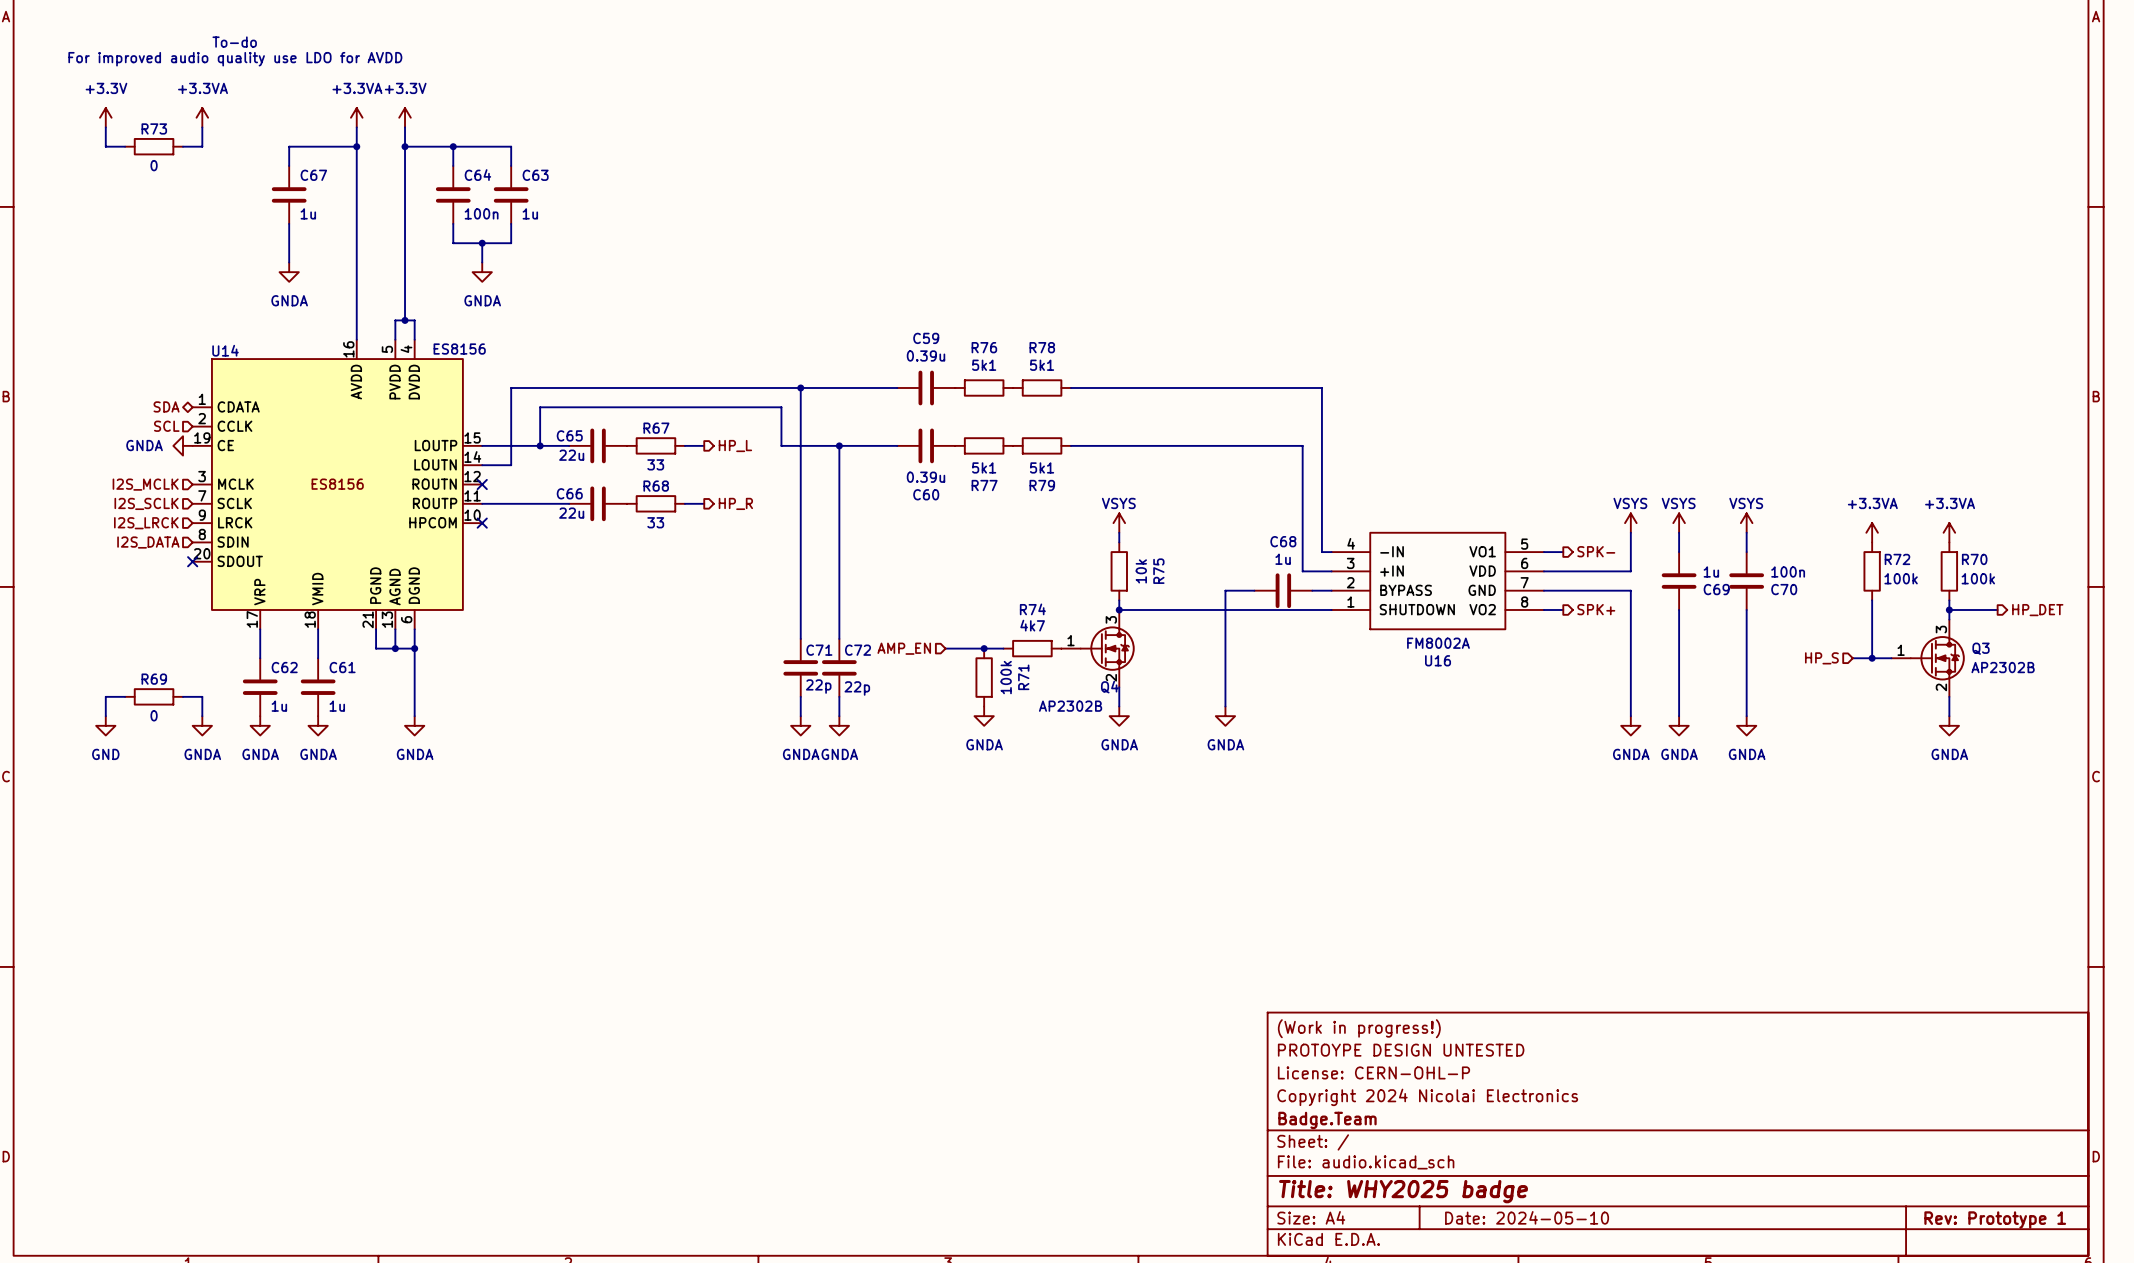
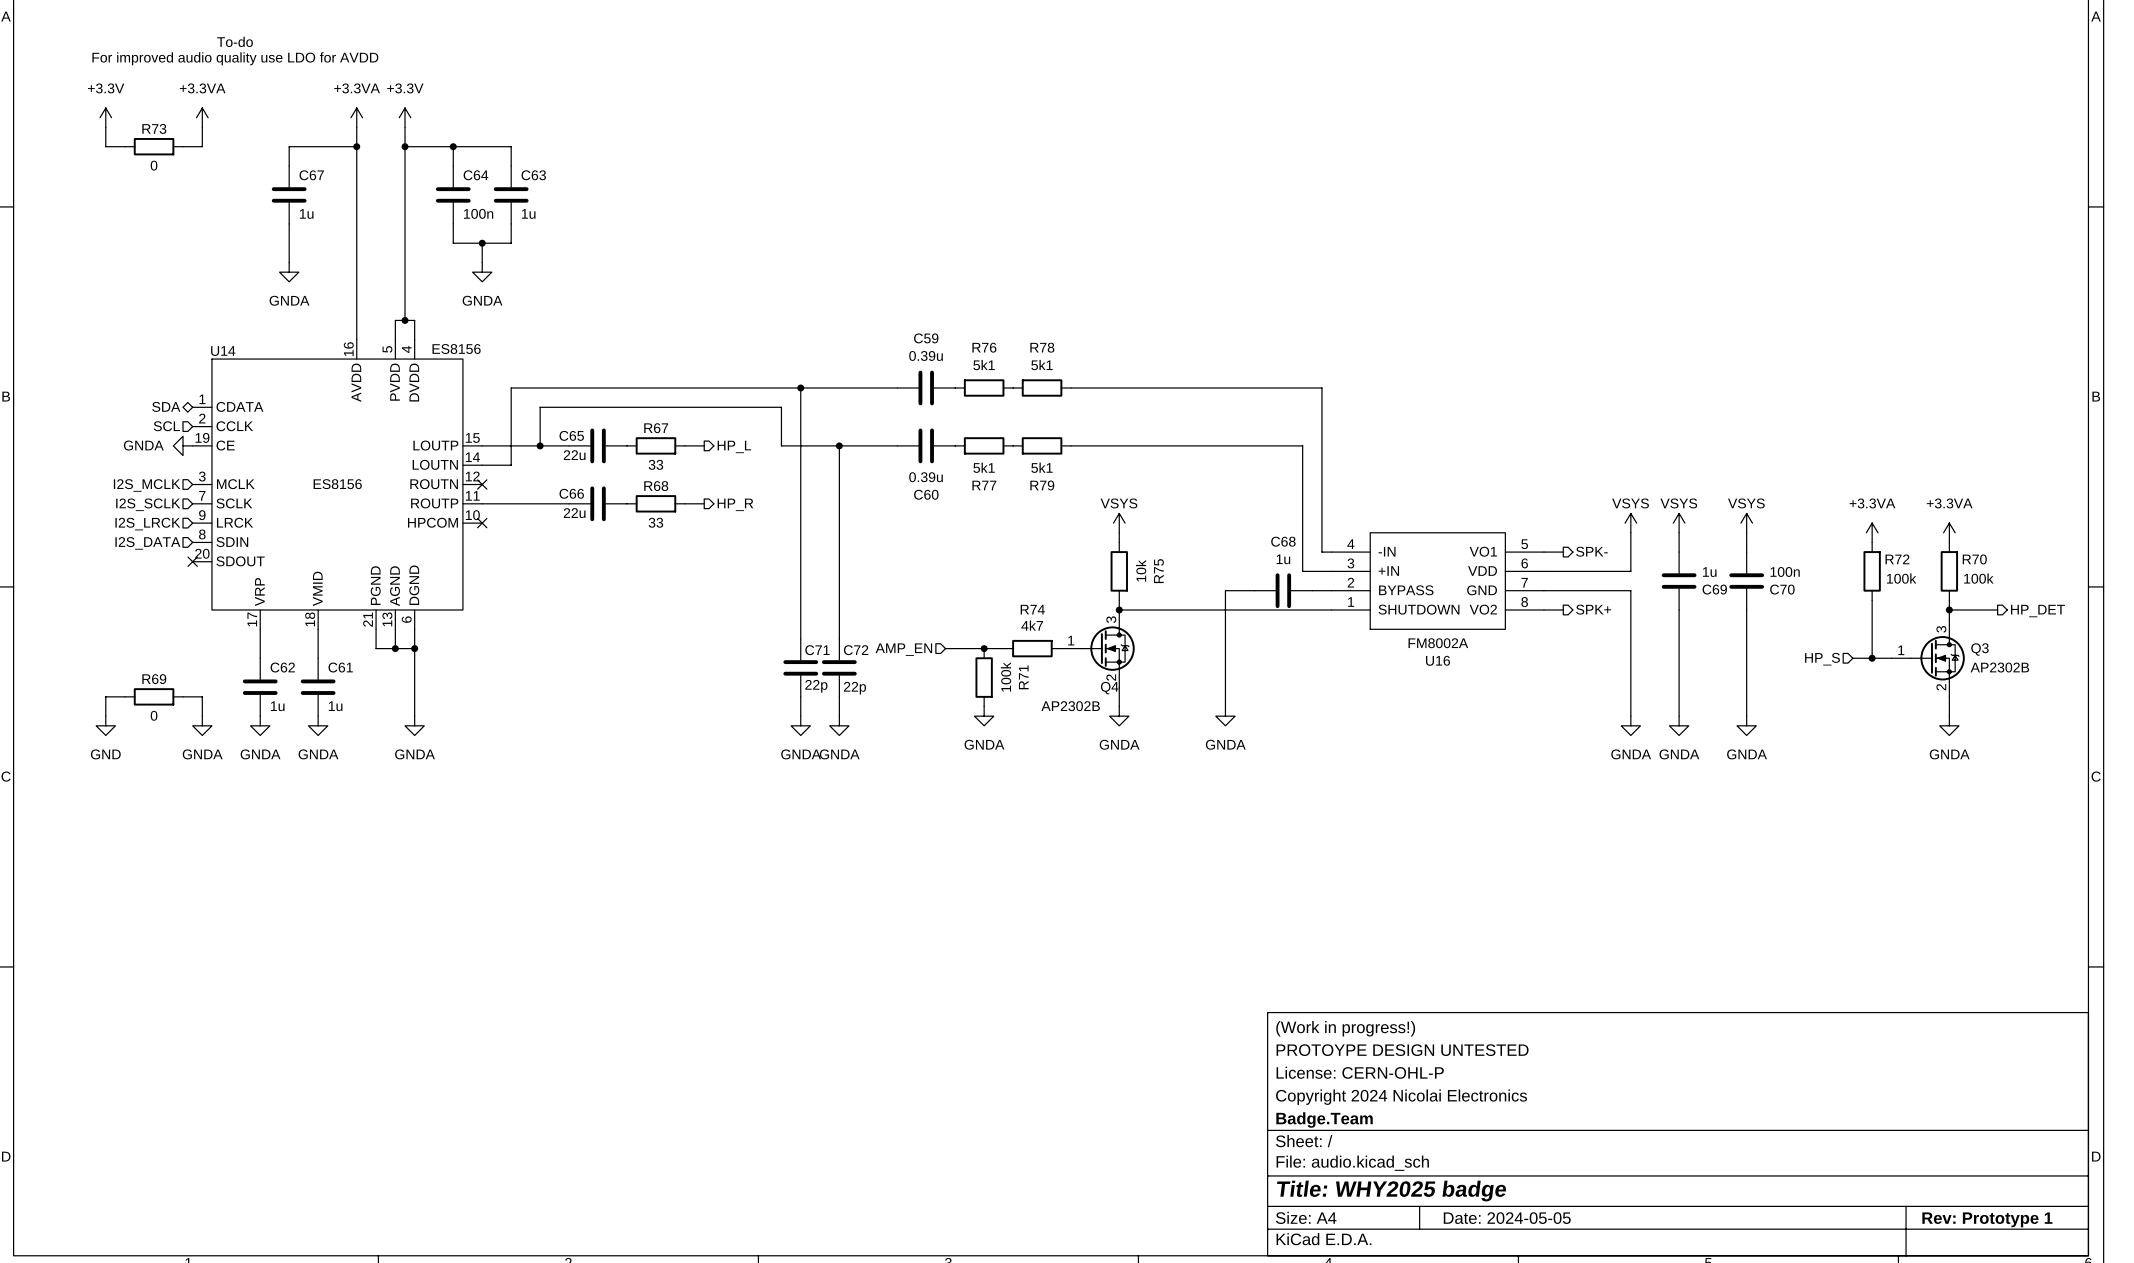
title block: Date: 2024-05-10 (1527, 1217) -> Date: 2024-05-05 (1507, 1218)

